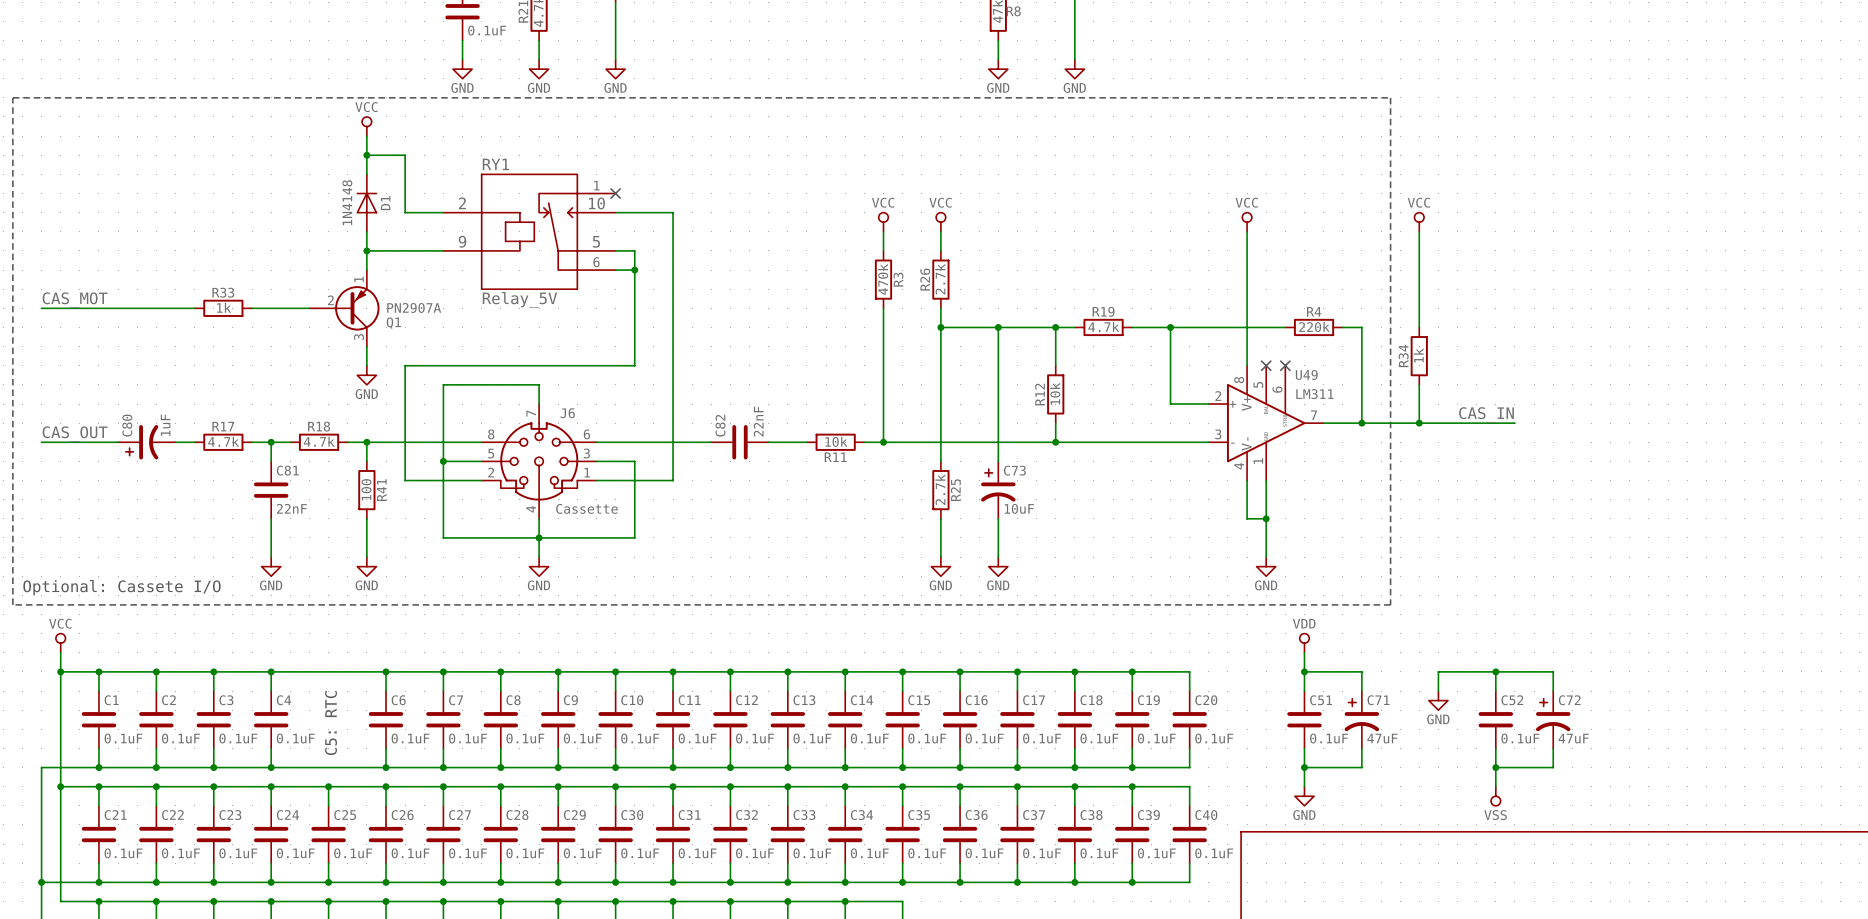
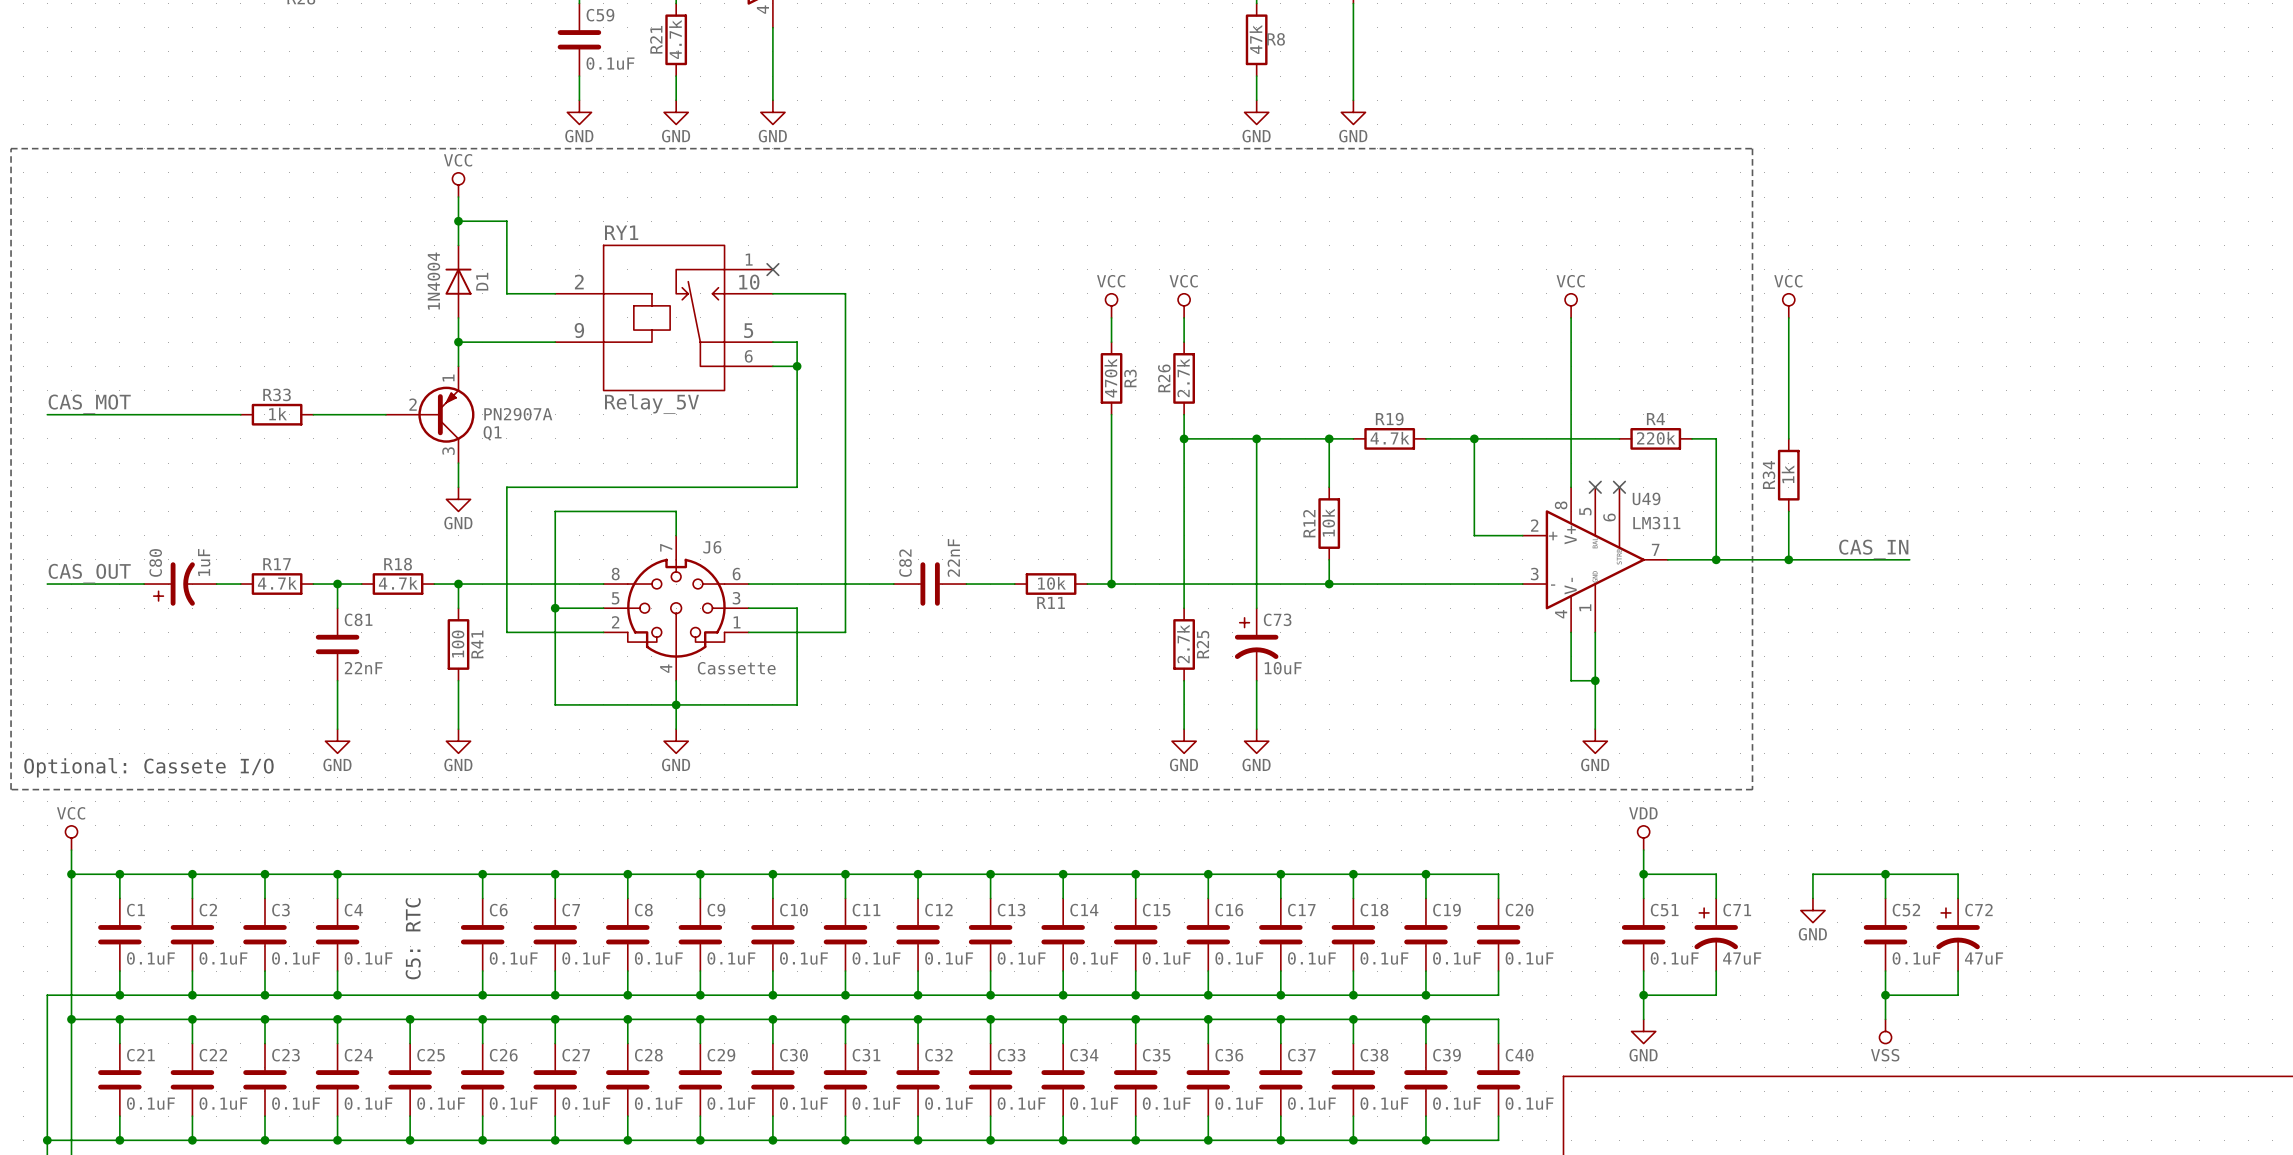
D1 value: 1N4148 (347, 202) -> 1N4004 (433, 281)

